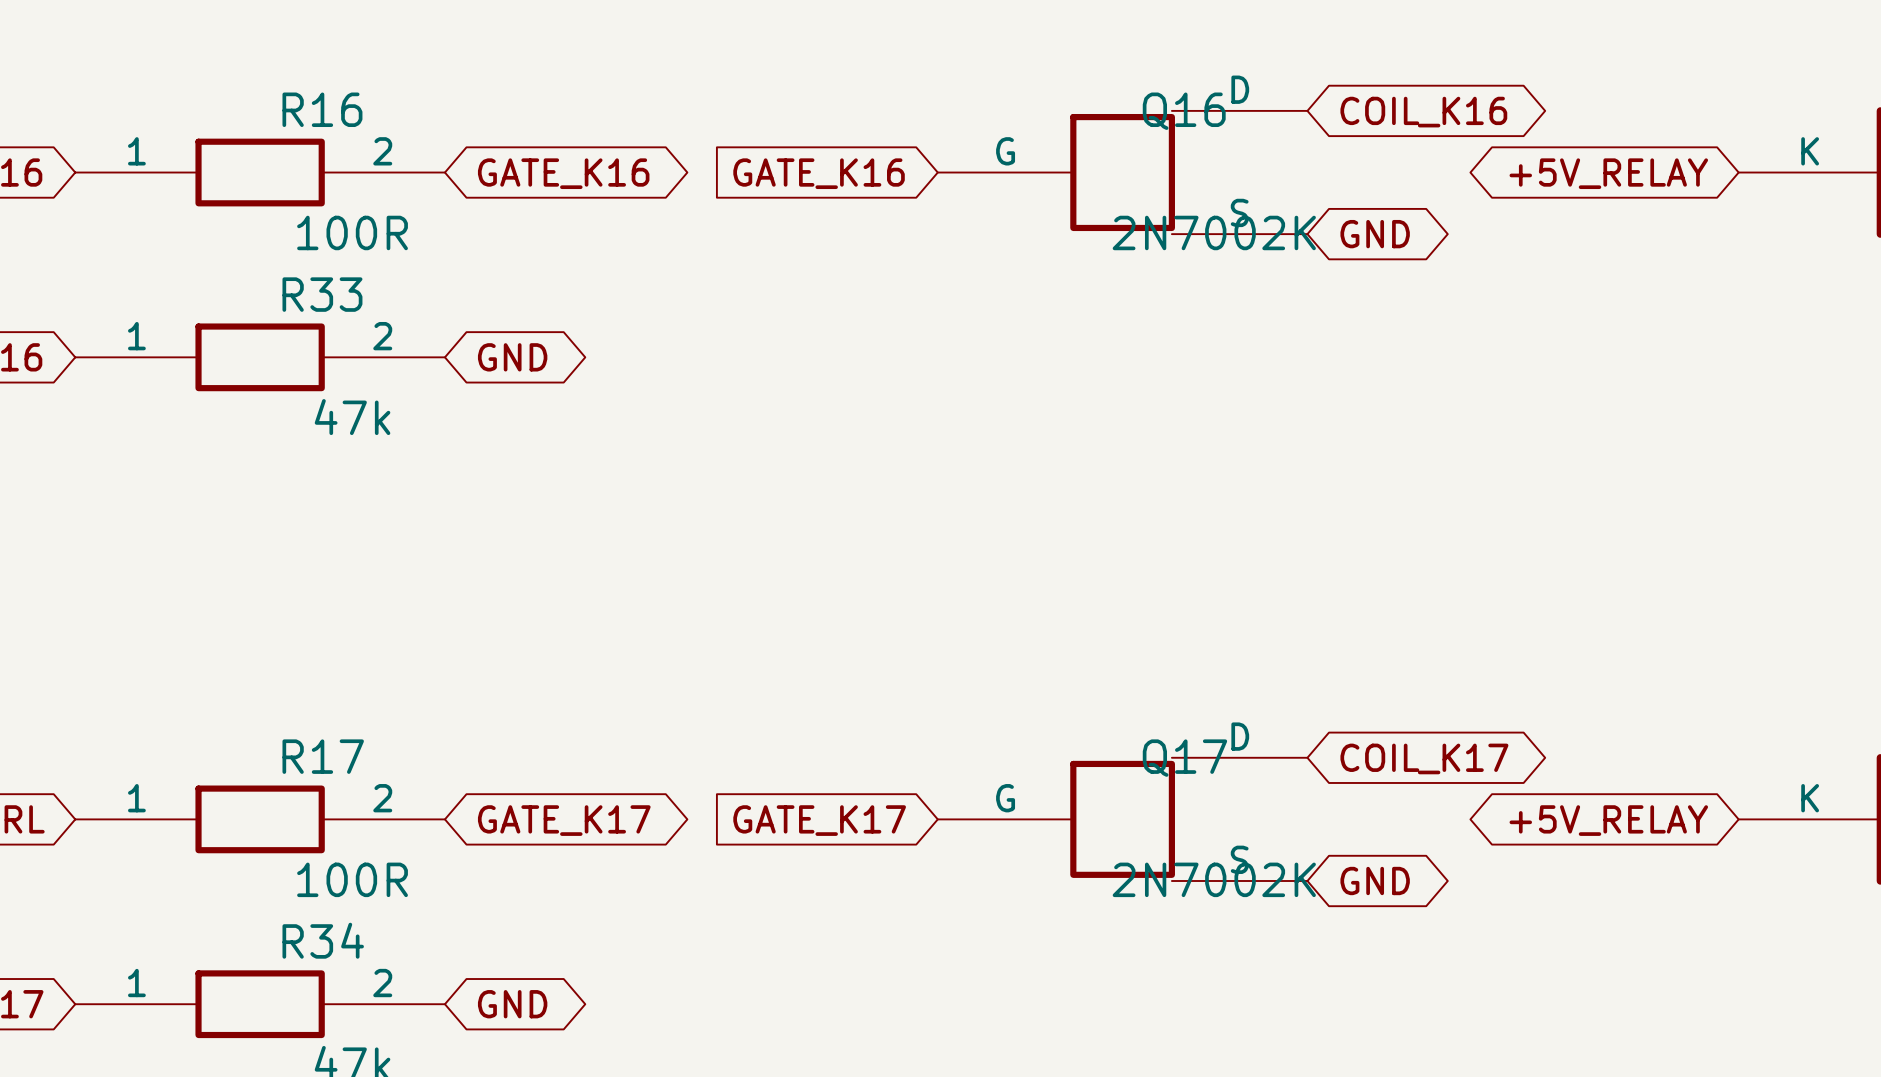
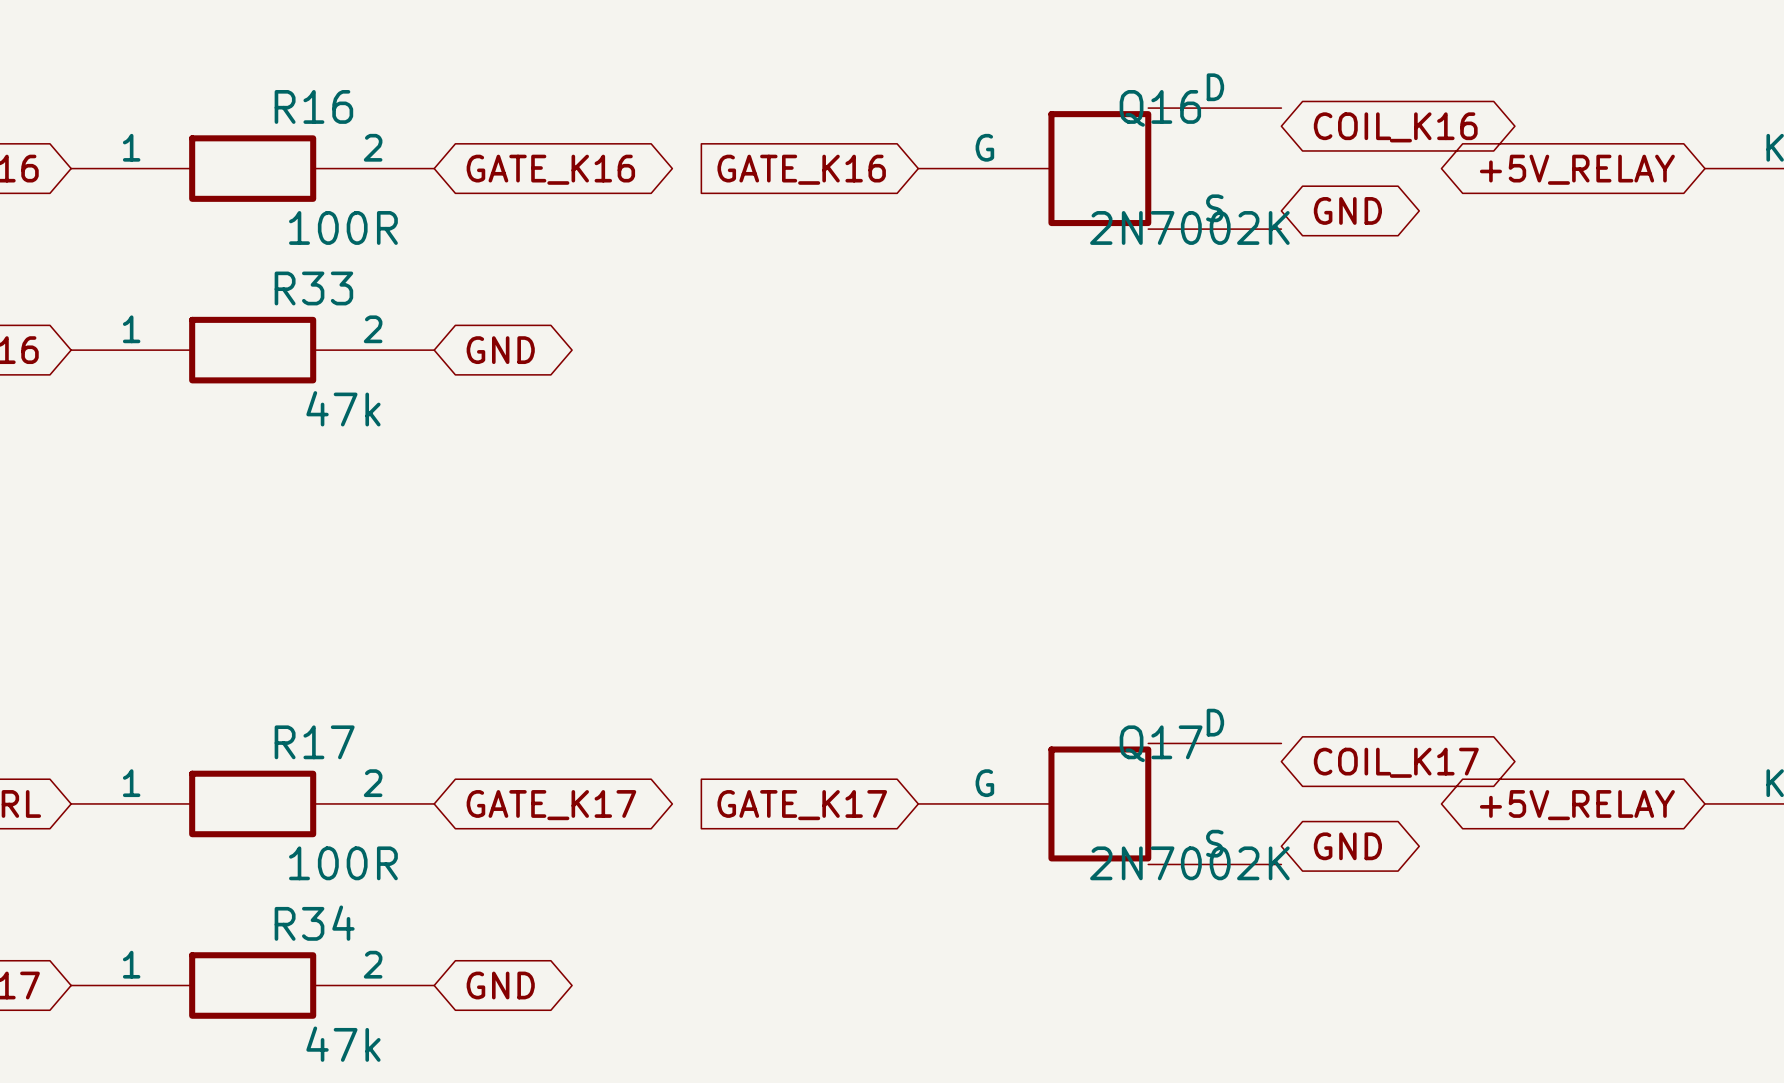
global label position: COIL_K16 (1423, 112) -> COIL_K16 (1395, 127)
global label position: GND (1375, 234) -> GND (1347, 210)
global label position: COIL_K17 (1424, 758) -> COIL_K17 (1396, 762)
global label position: GND (1375, 881) -> GND (1347, 846)

